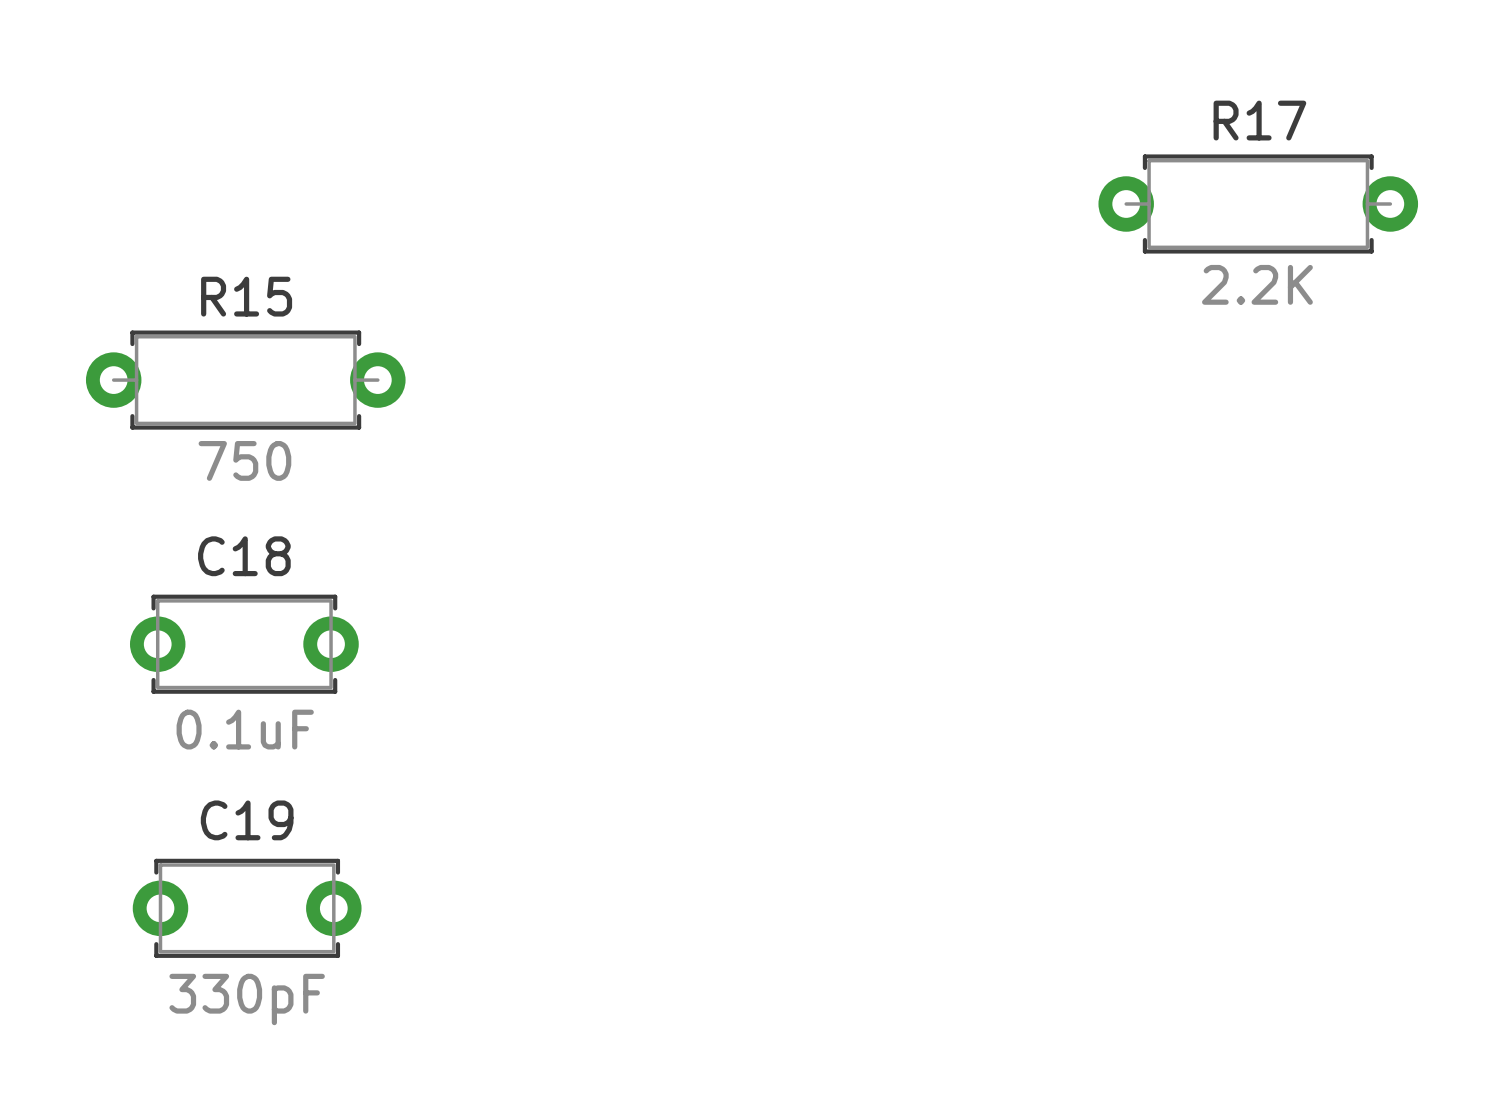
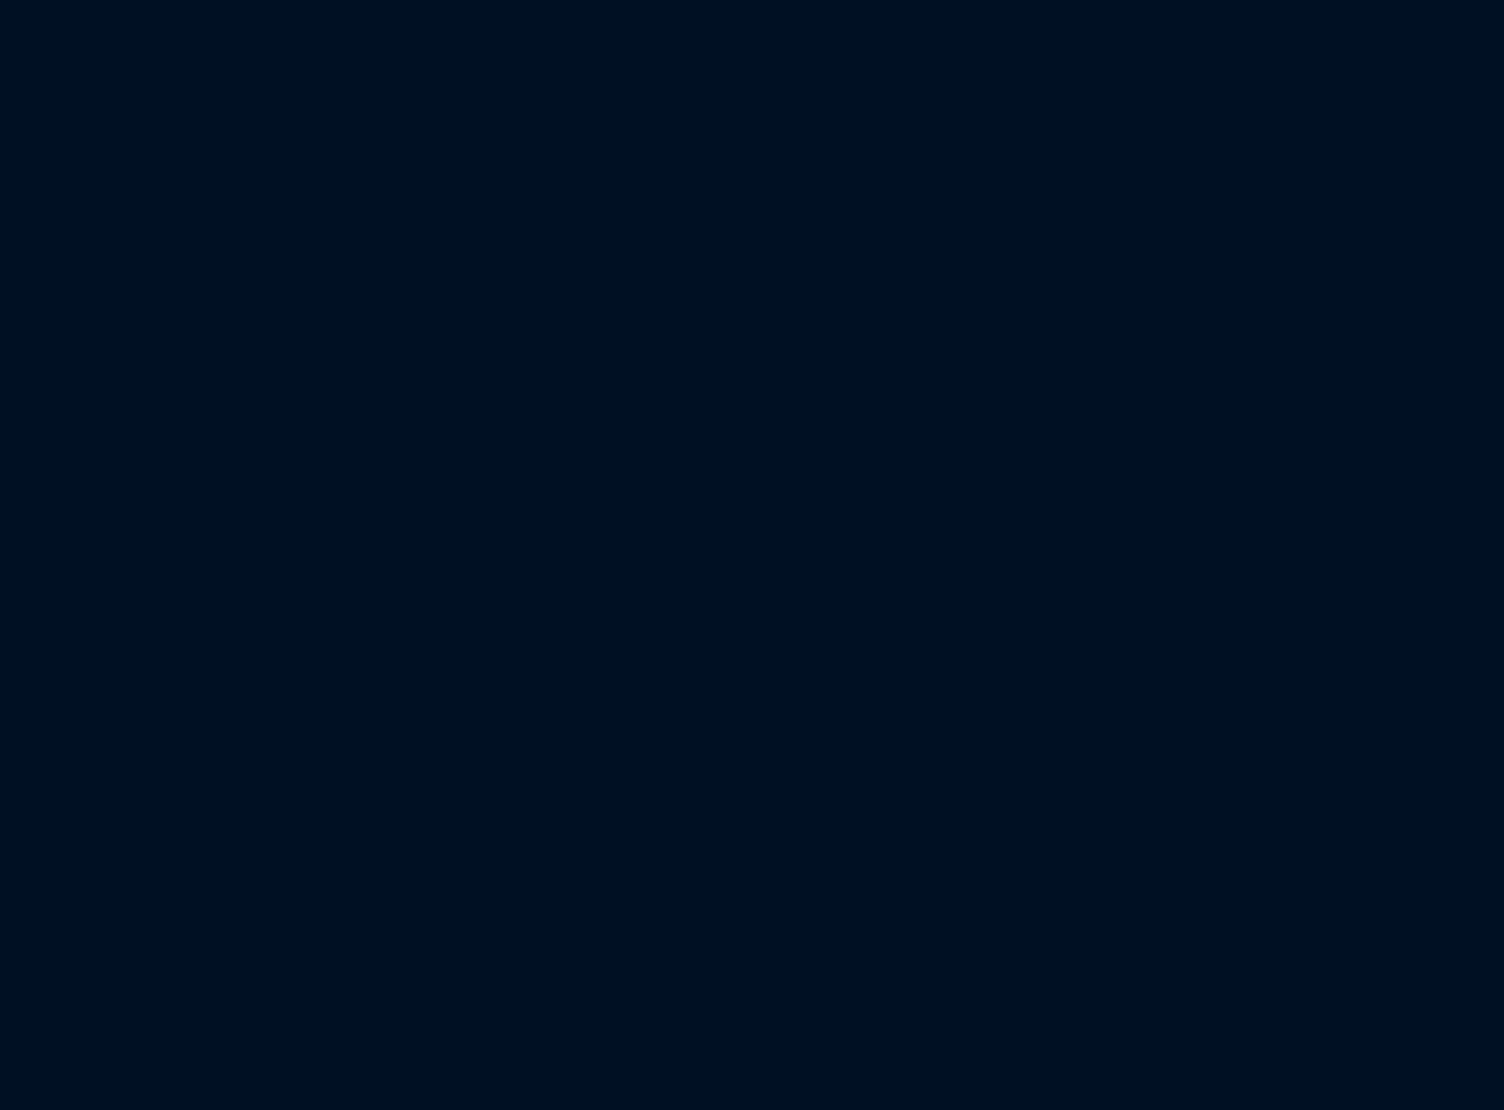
R17: 2.2K (1258, 203) -> none
R15: 750 (245, 380) -> none
C18: 0.1uF (244, 644) -> none
C19: 330pF (247, 908) -> none

